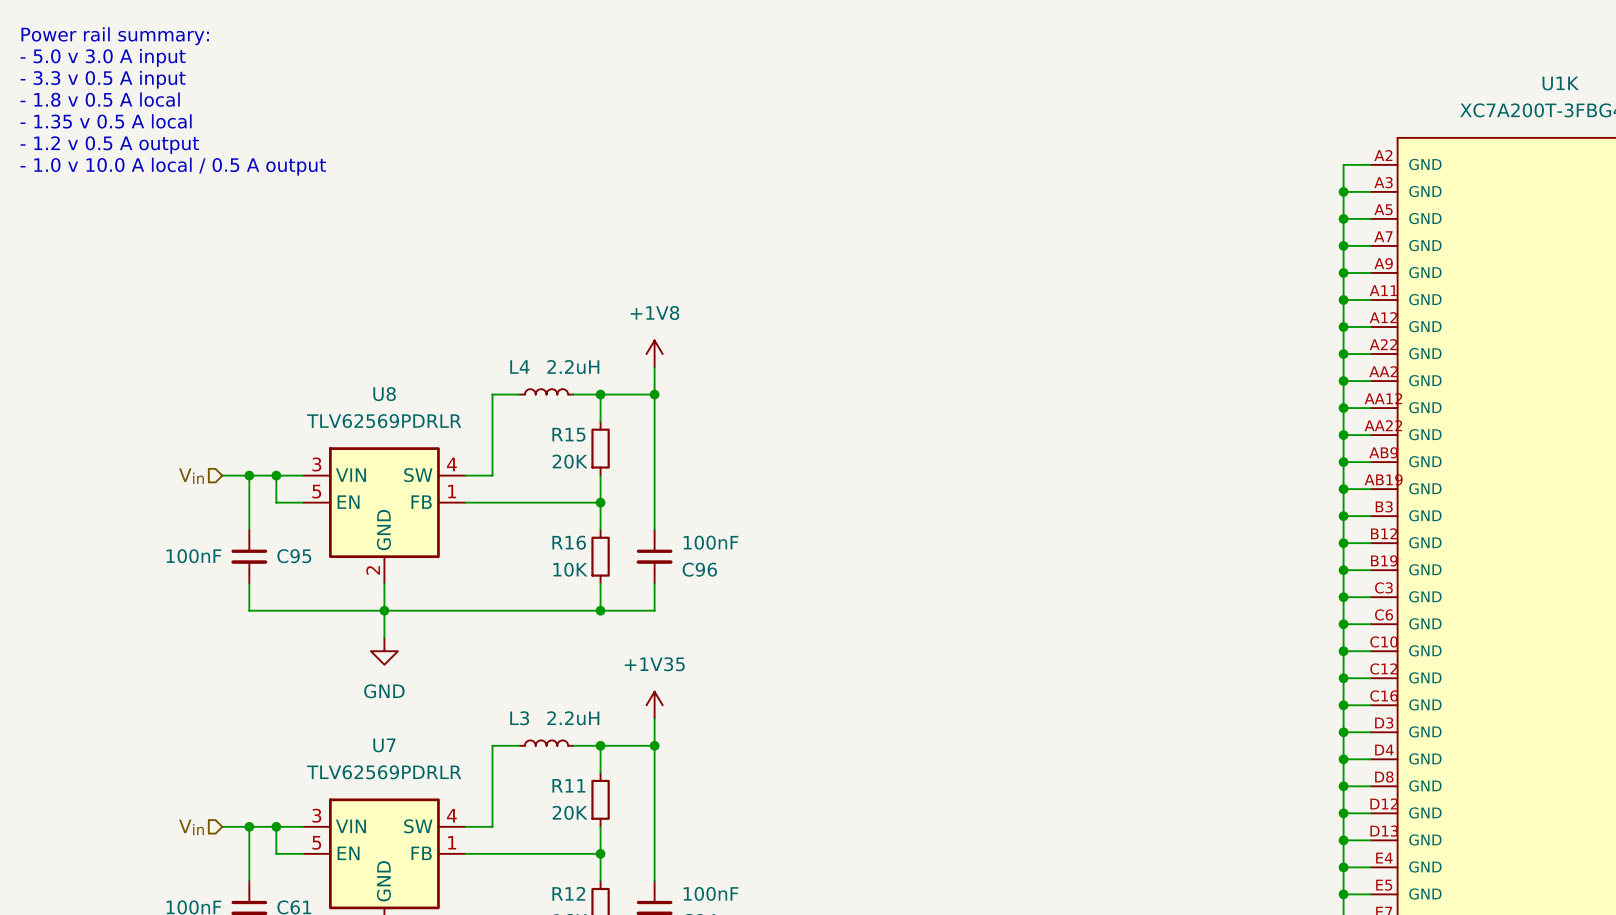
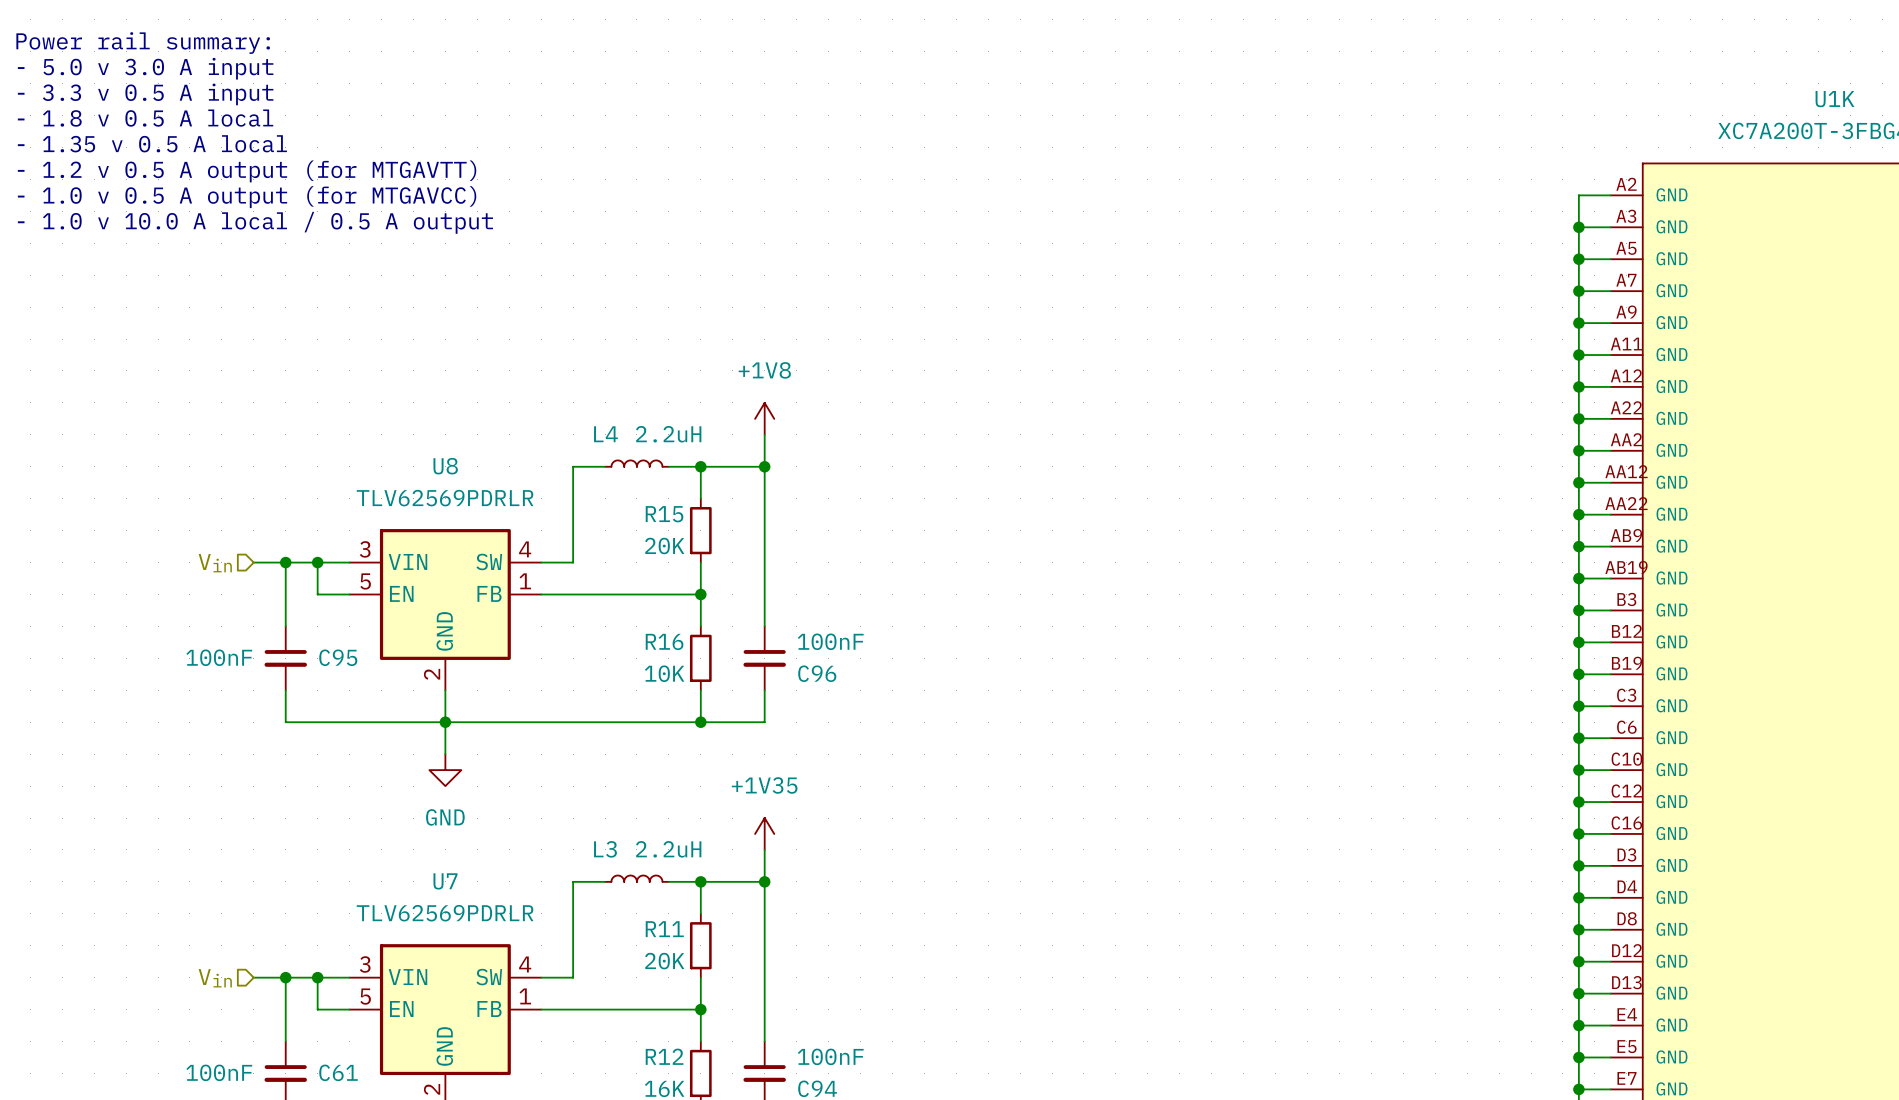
text: - 1.2 v 0.5 A output (109, 145) -> - 1.2 v 0.5 A output (for MTGAVTT) (247, 171)
text: - 1.0 v 10.0 A local / 0.5 A output (173, 166) -> - 1.0 v 0.5 A output (for MTGAVCC) (247, 197)
text: none -> - 1.0 v 10.0 A local / 0.5 A output (255, 222)

